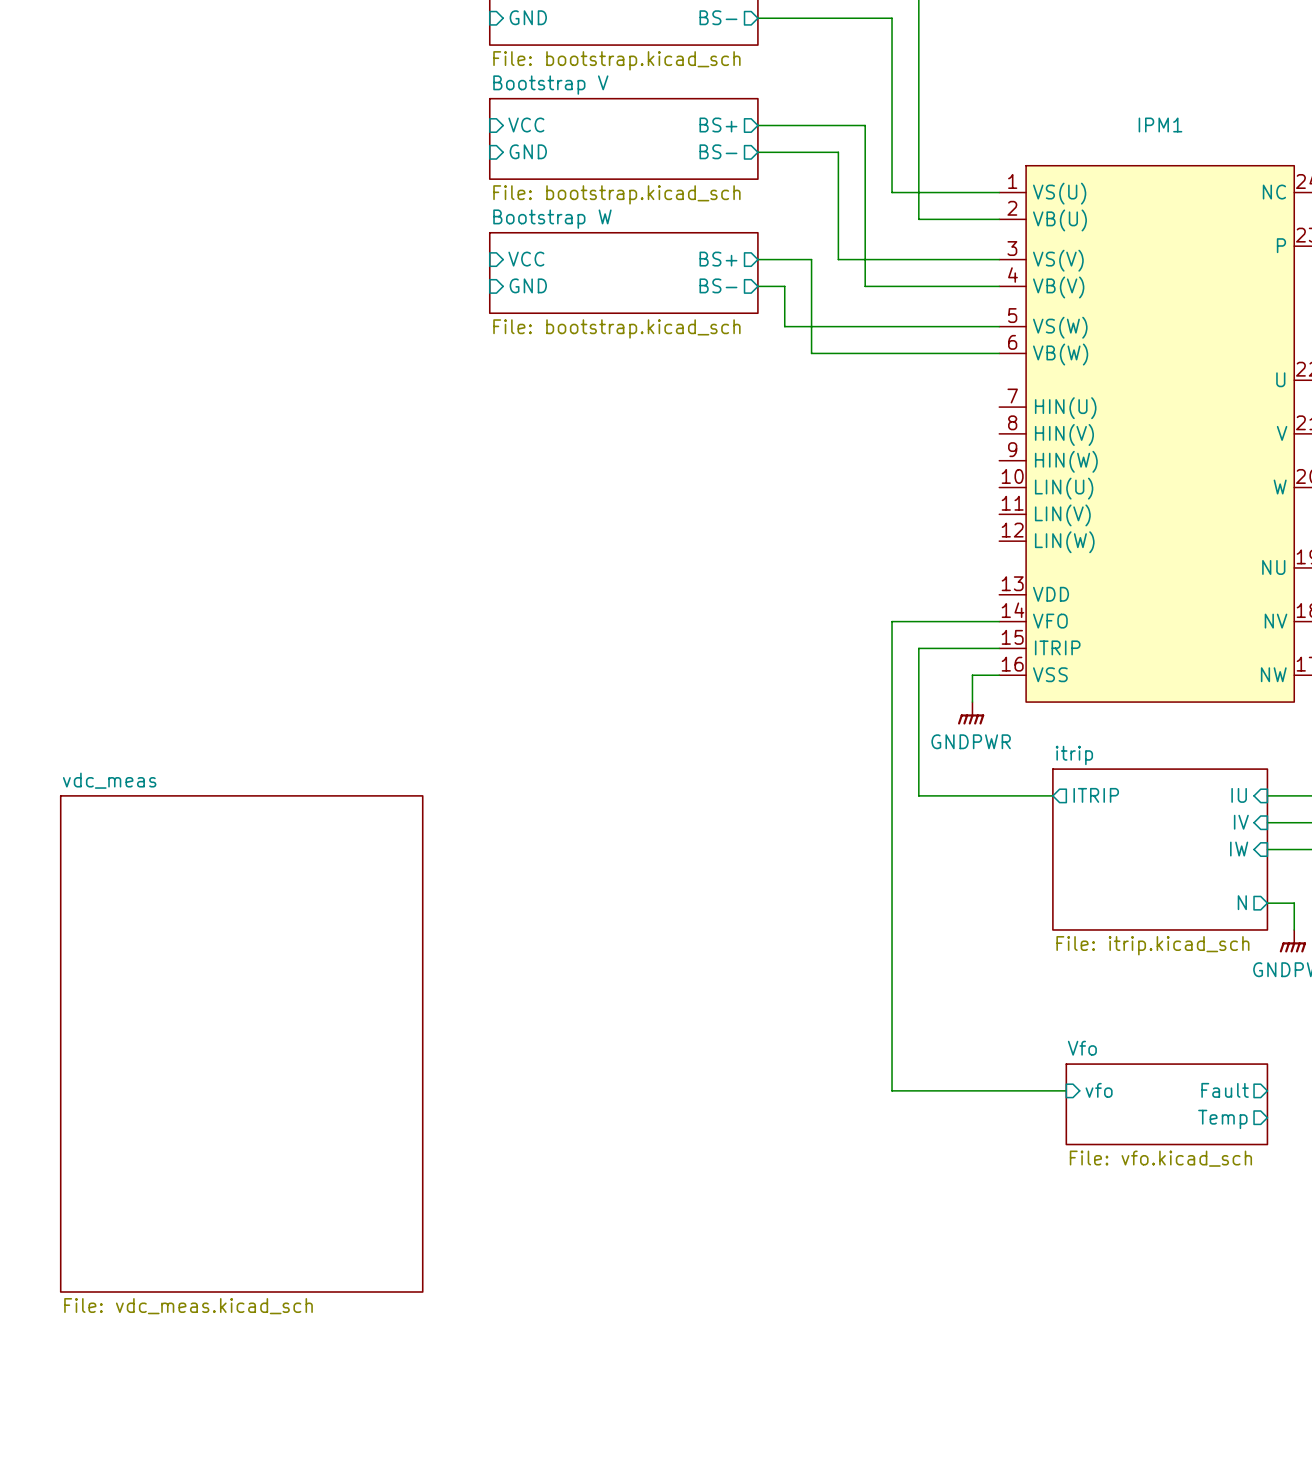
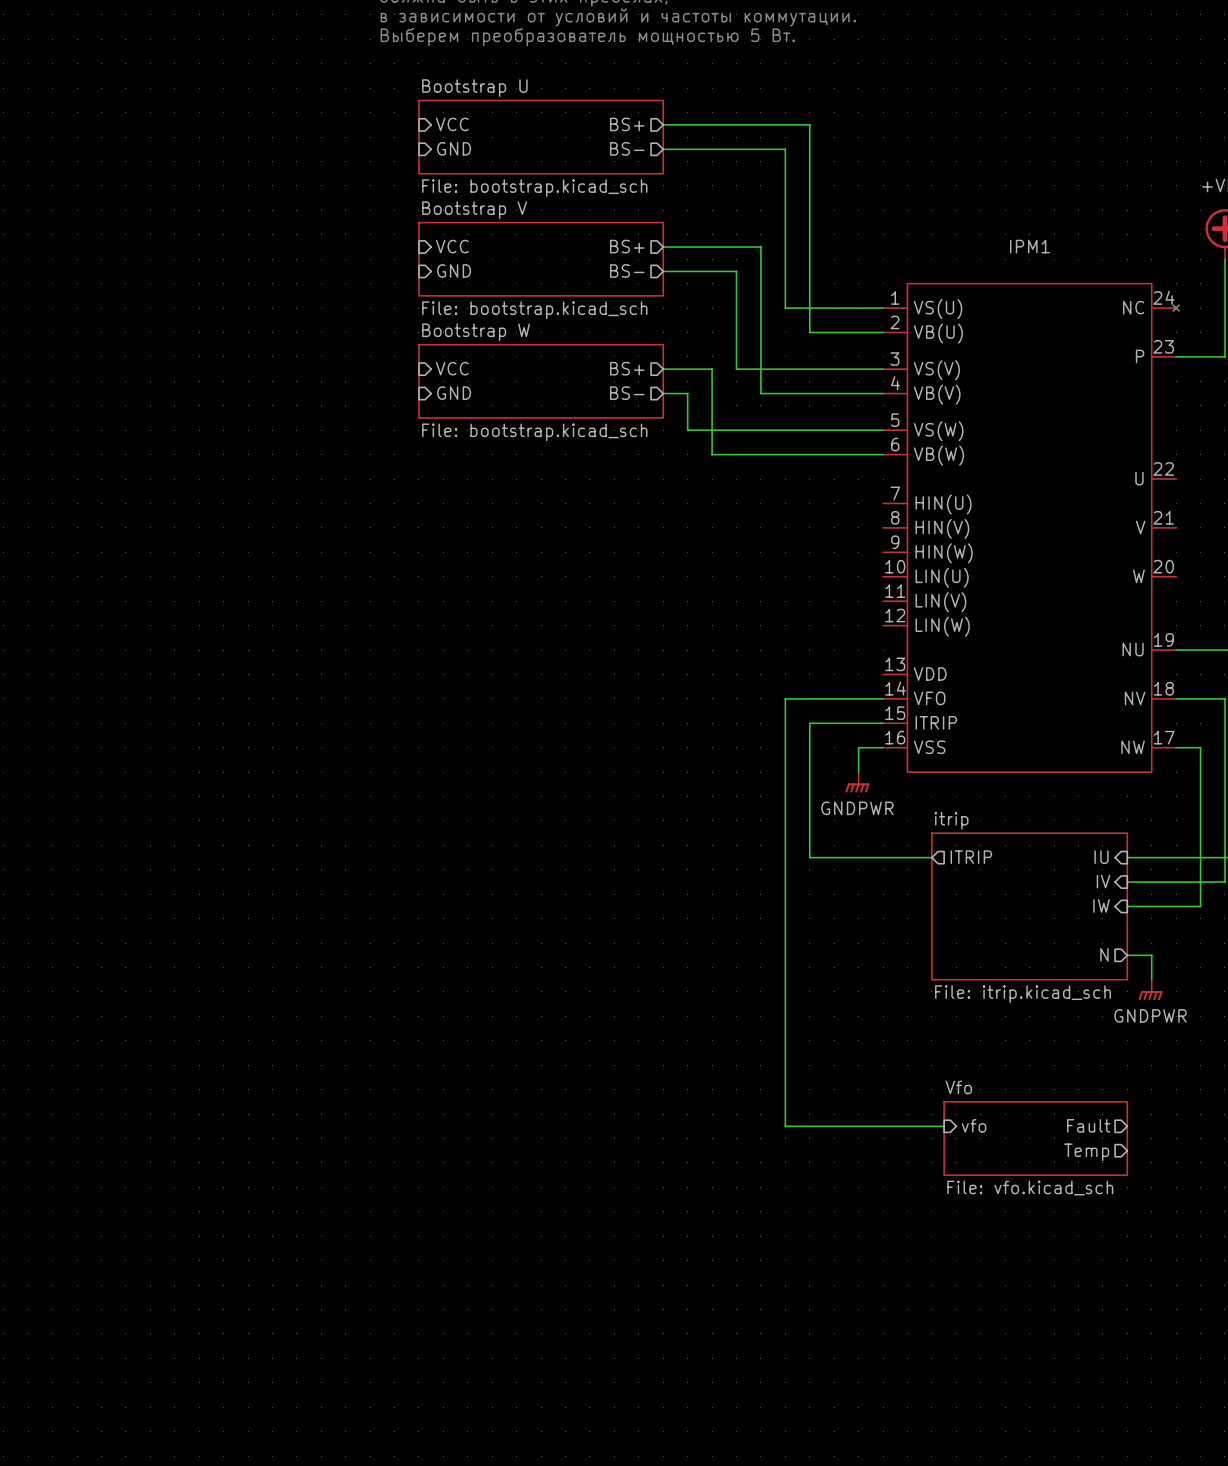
sheet vdc_meas: File: vdc_meas.kicad_sch (241, 1043) -> none

